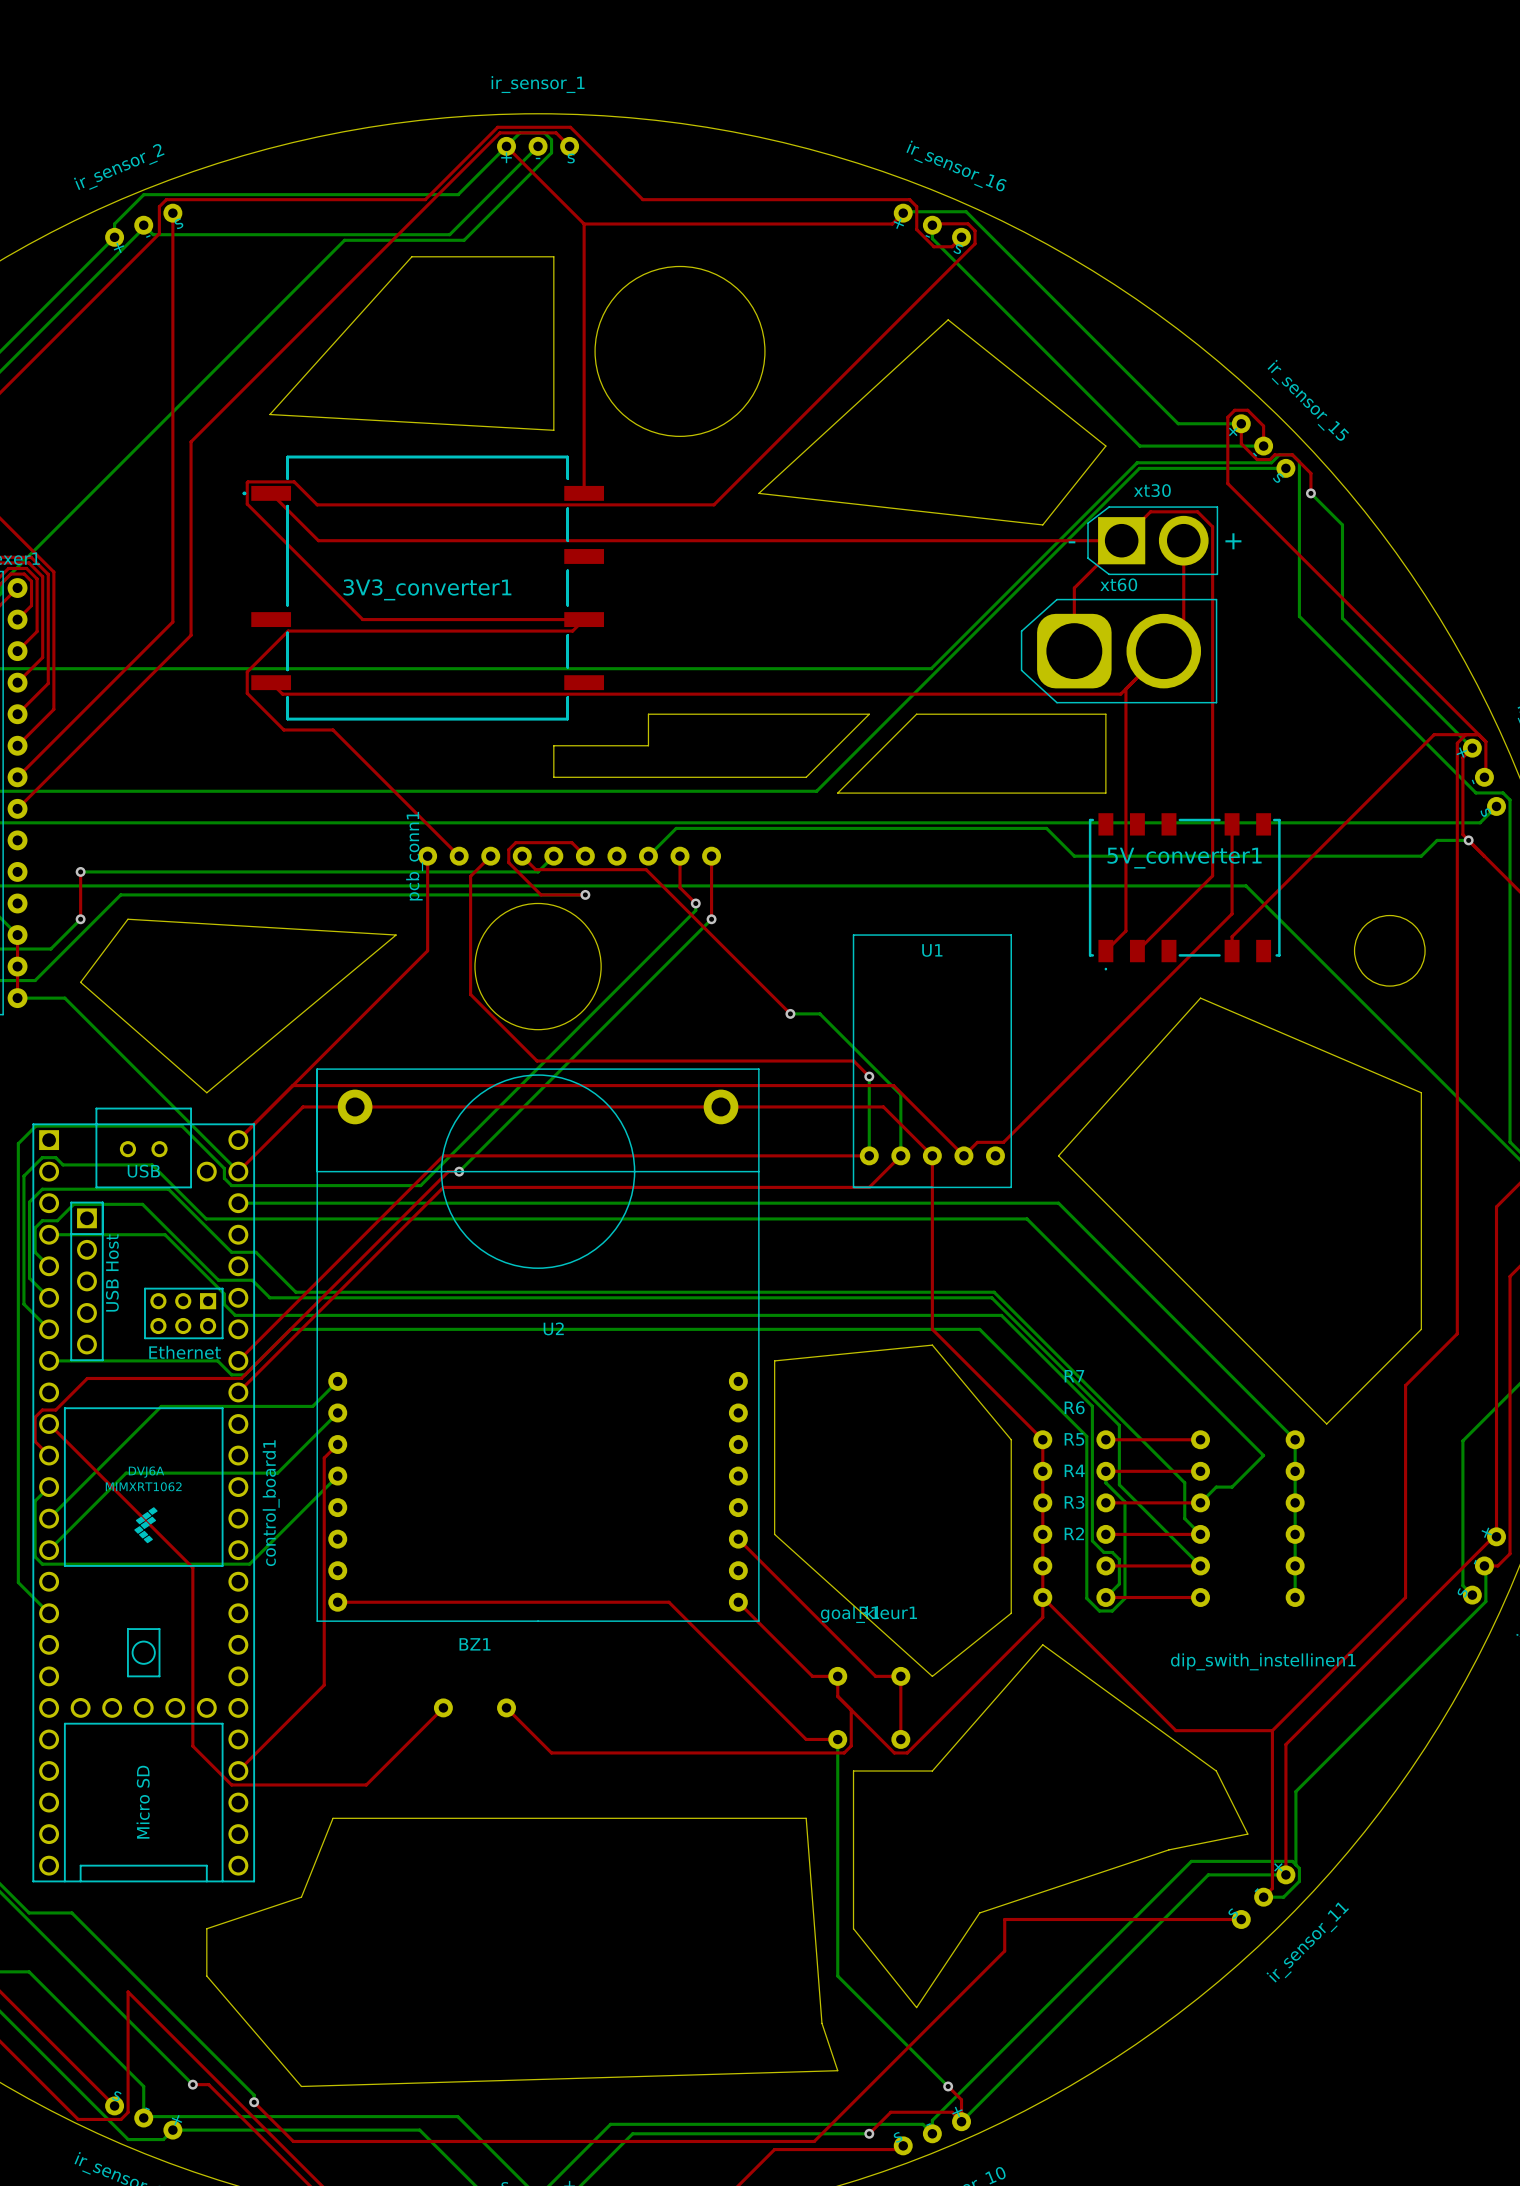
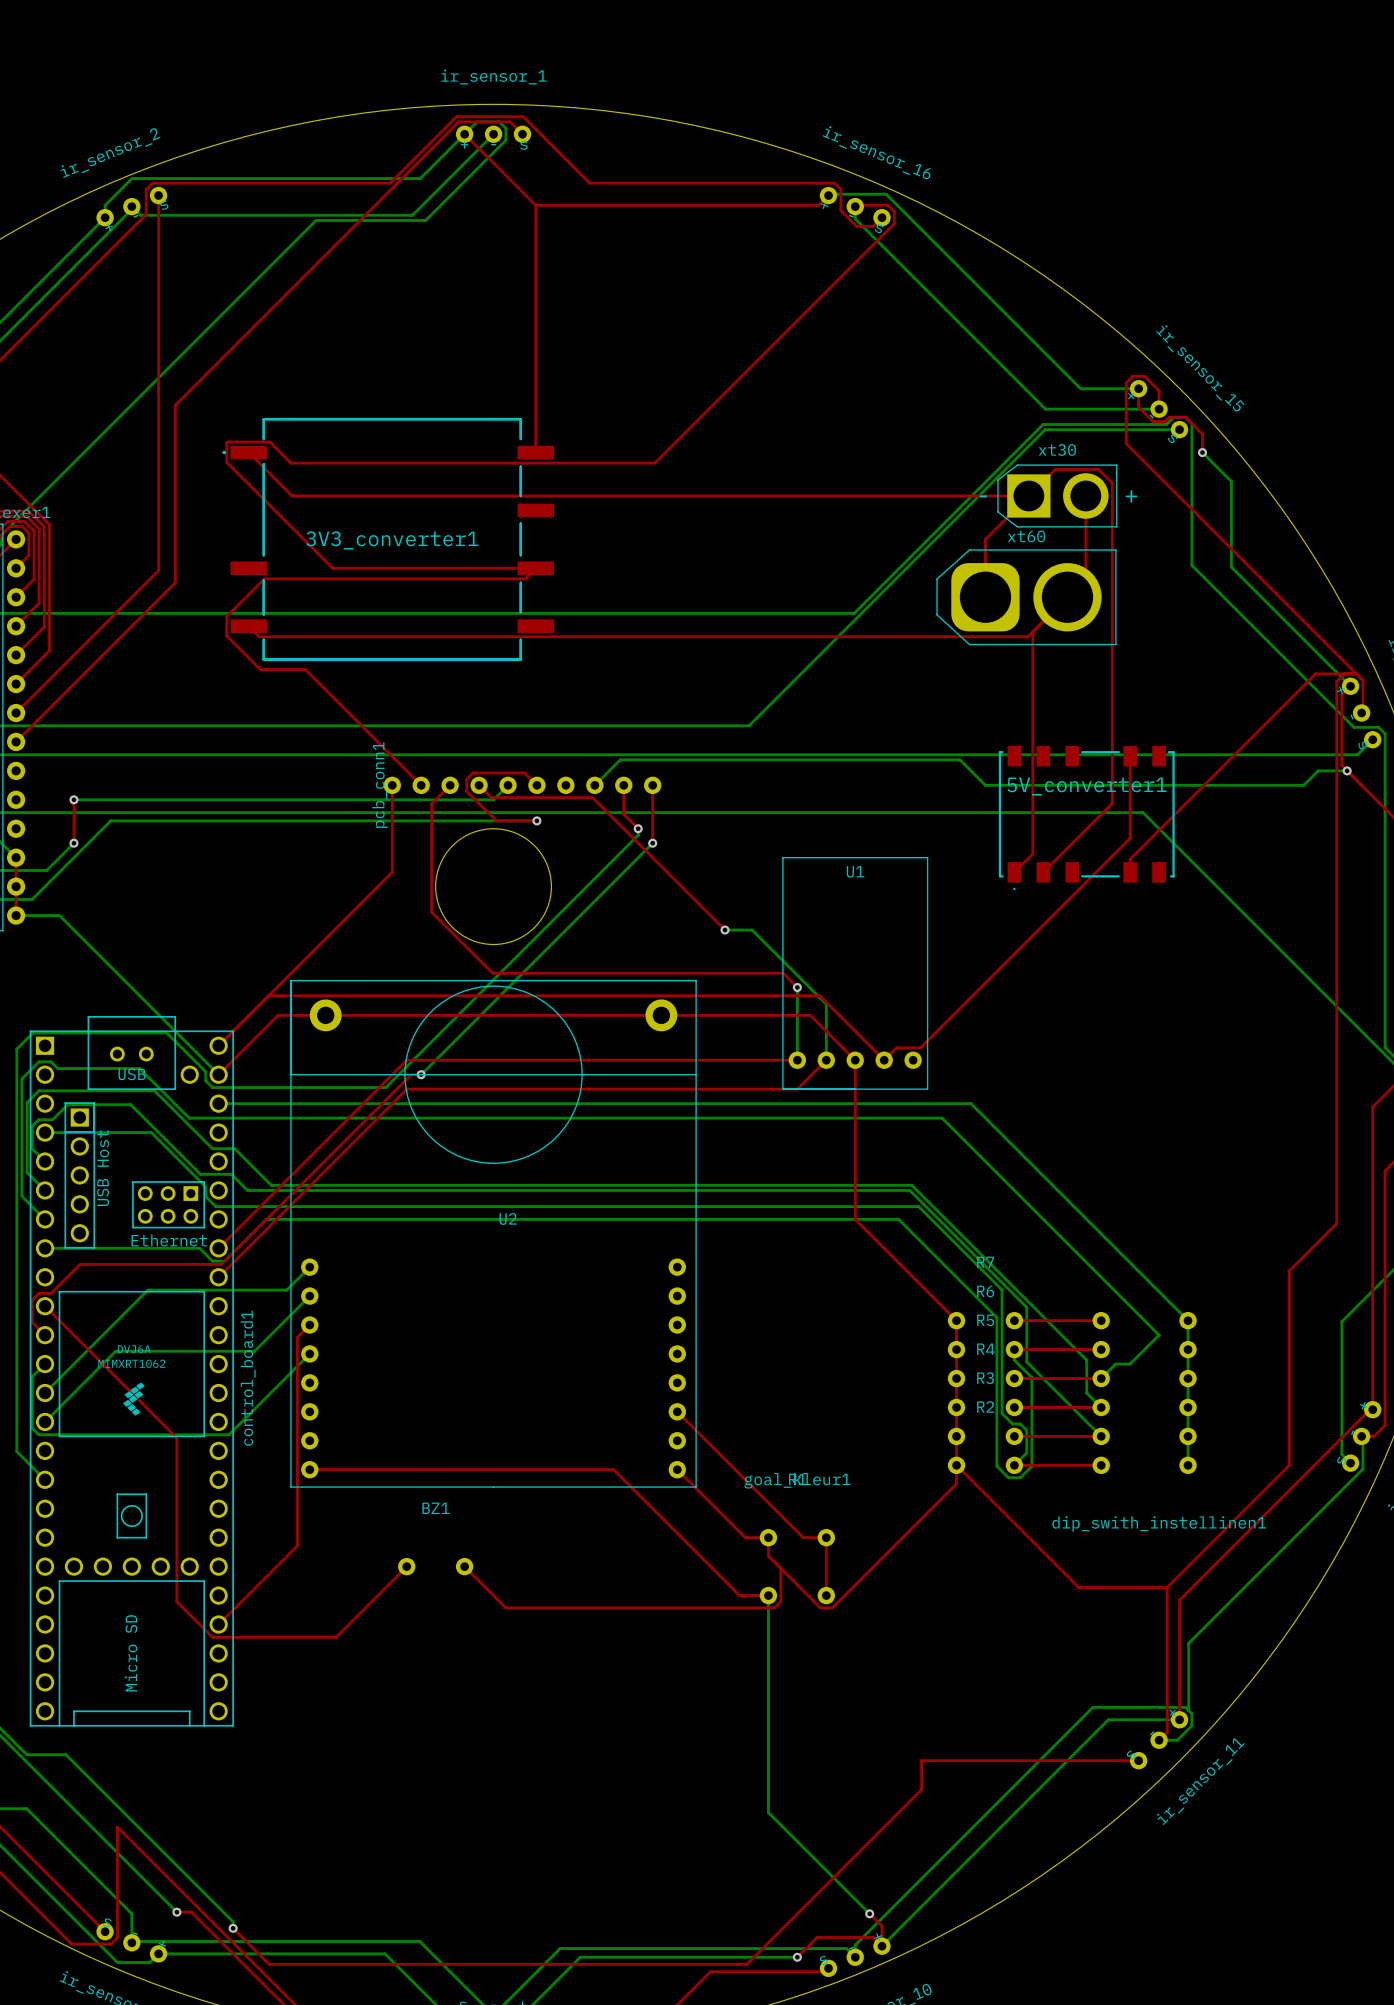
board edge: (411, 256) (553, 256) (553, 430) (269, 414) (411, 256) -> none
round board edge: [594, 266, 766, 437] -> none
board edge: (948, 319) (1105, 446) (1042, 524) (758, 493) (948, 319) -> none
board edge: (648, 714) (869, 714) (806, 777) (553, 777) (553, 745) (648, 745) (648, 714) -> none
board edge: (916, 714) (1105, 714) (1105, 793) (837, 793) (916, 714) -> none
round board edge: [1354, 915, 1426, 987] -> none
board edge: (127, 919) (396, 935) (206, 1092) (80, 982) (127, 919) -> none
board edge: (1200, 998) (1421, 1092) (1421, 1329) (1326, 1424) (1058, 1155) (1200, 998) -> none
board edge: (932, 1345) (774, 1360) (774, 1534) (932, 1676) (1011, 1613) (1011, 1439) (932, 1345) -> none
board edge: (1042, 1644) (1216, 1771) (1247, 1834) (1168, 1849) (979, 1912) (916, 2007) (853, 1928) (853, 1771) (932, 1771) (1042, 1644) -> none
board edge: (333, 1818) (301, 1897) (206, 1928) (206, 1976) (301, 2086) (837, 2070) (821, 2023) (806, 1818) (333, 1818) -> none

